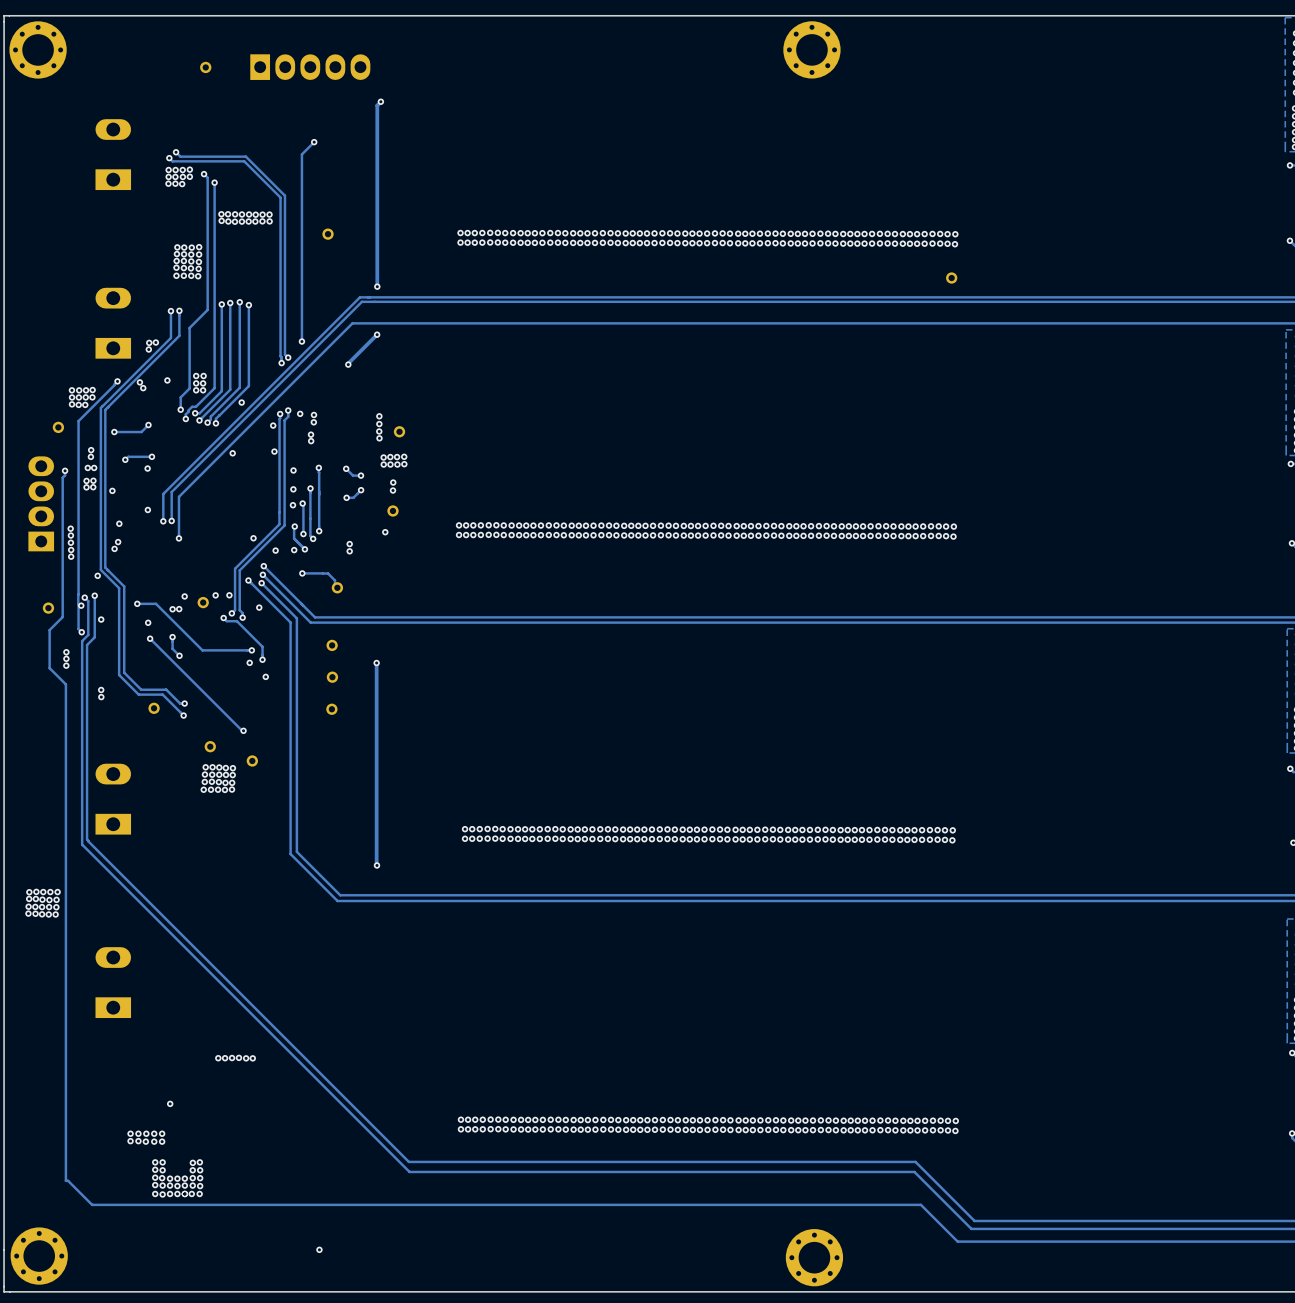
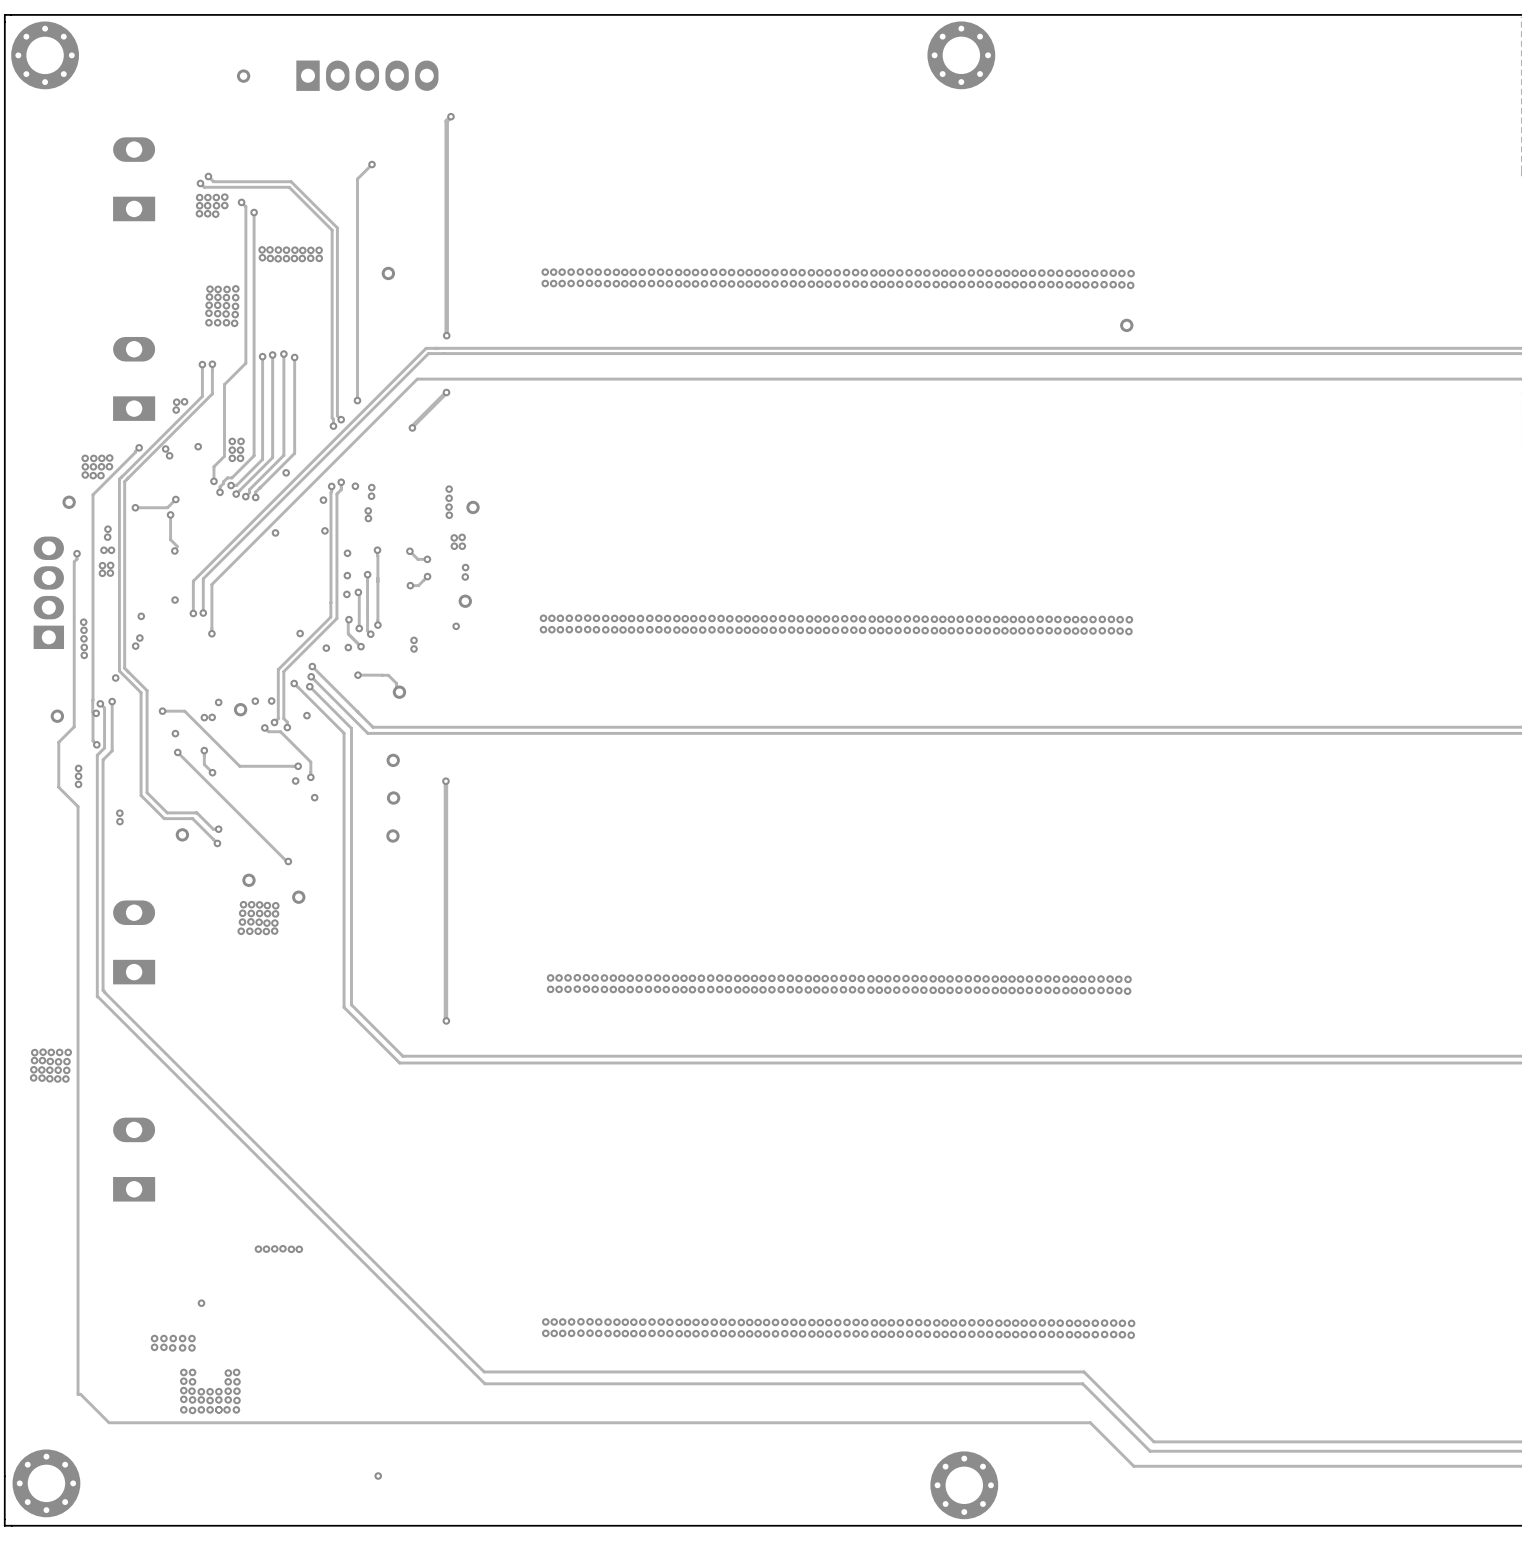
track: none -> (170, 514) (170, 539) (177, 546)
via: none -> (170, 514)
track: (151, 456) (128, 456) (125, 459) -> none
via: (151, 456) -> none
via: (404, 456) -> none
via: (397, 457) -> none
via: (125, 459) -> none
via: (397, 464) -> none
via: (404, 464) -> none
via: (112, 490) -> none
via: (101, 619) -> none

